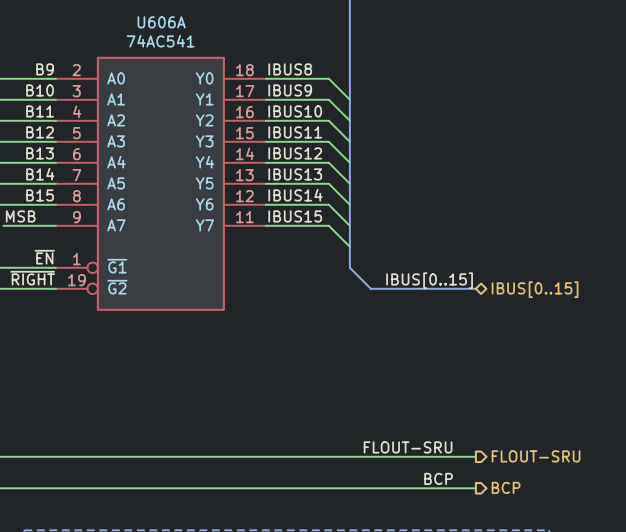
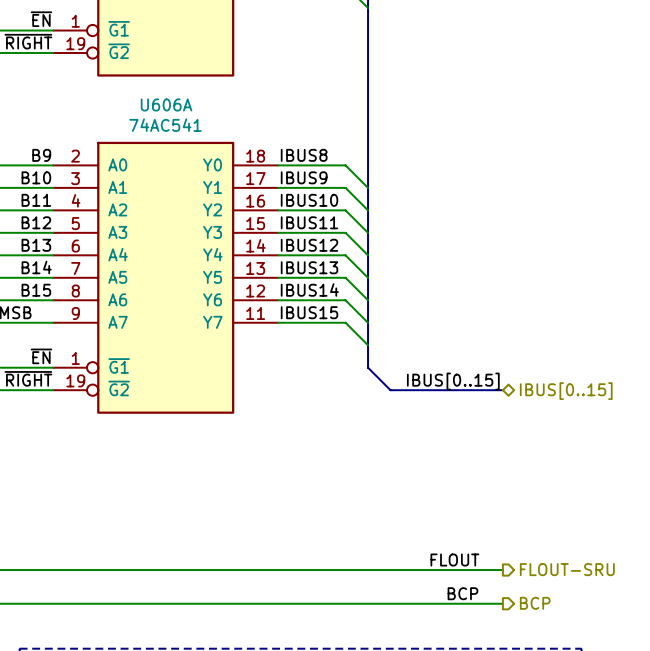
label: FLOUT-SRU (408, 447) -> FLOUT (454, 560)

